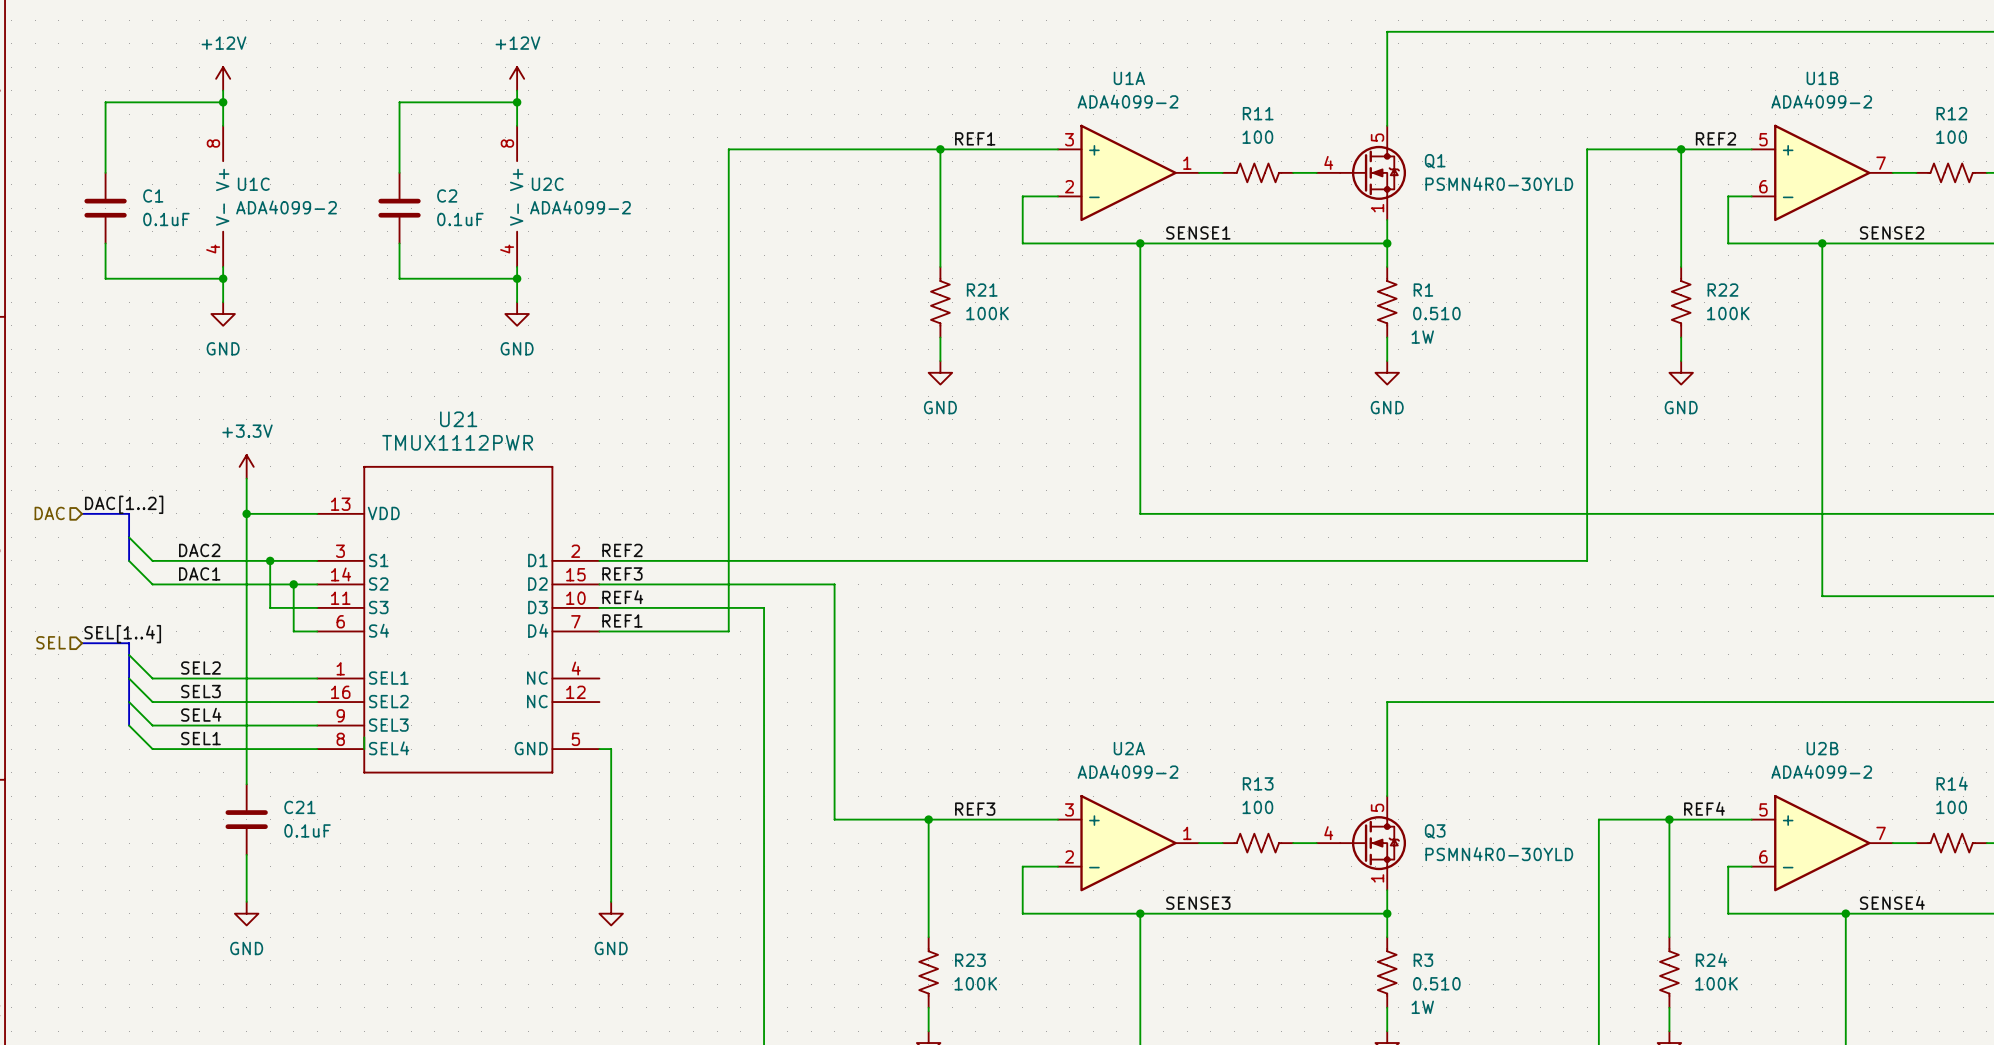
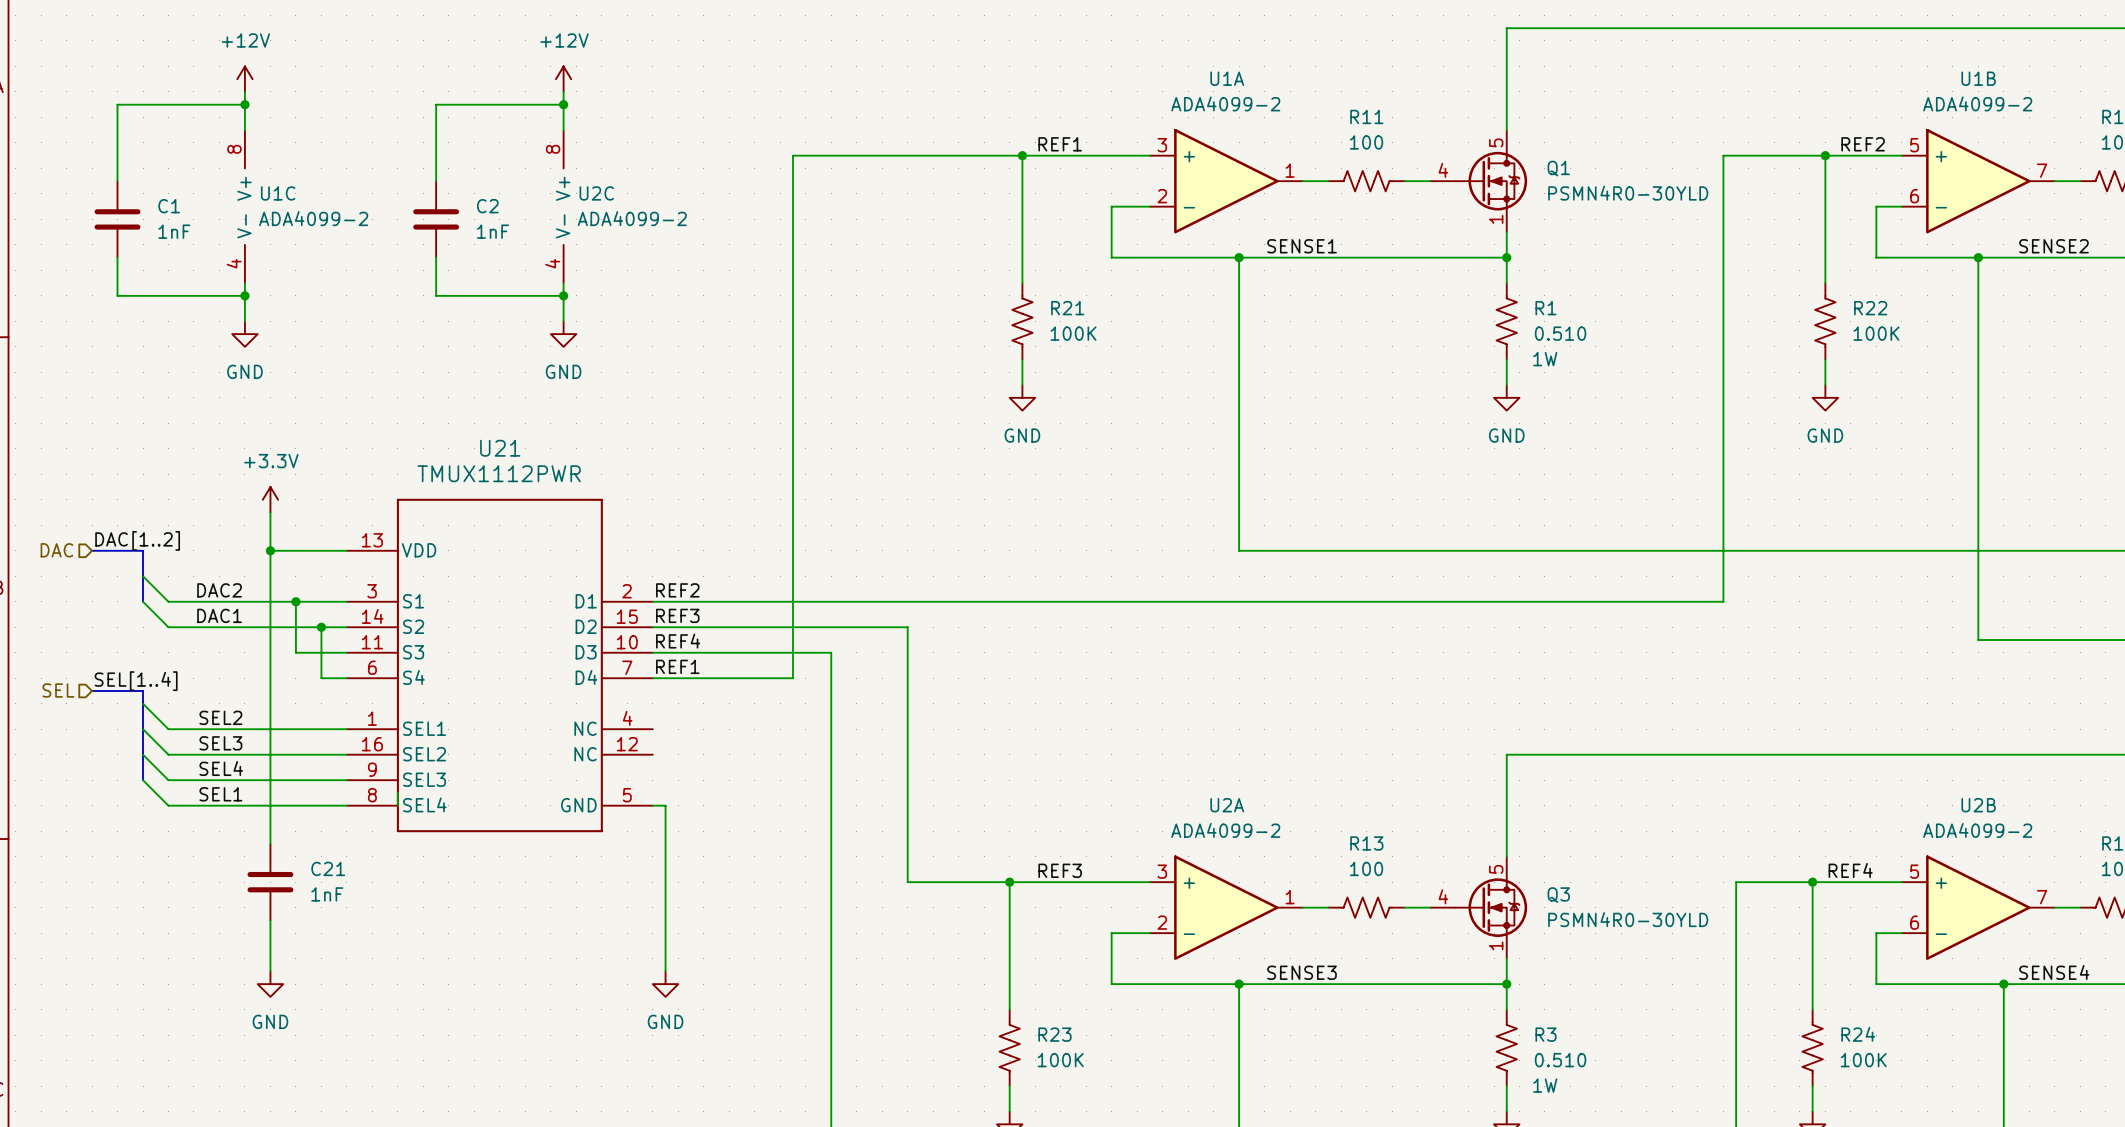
C1 value: 0.1uF (166, 219) -> 1nF (174, 231)
C2 value: 0.1uF (460, 219) -> 1nF (492, 231)
C21 value: 0.1uF (307, 830) -> 1nF (327, 894)

